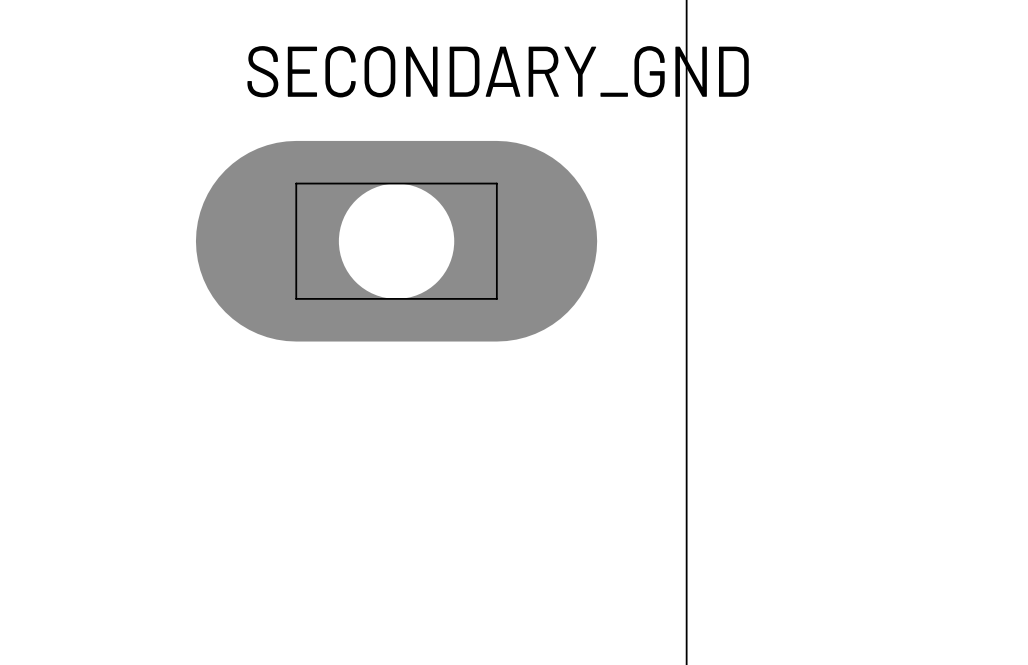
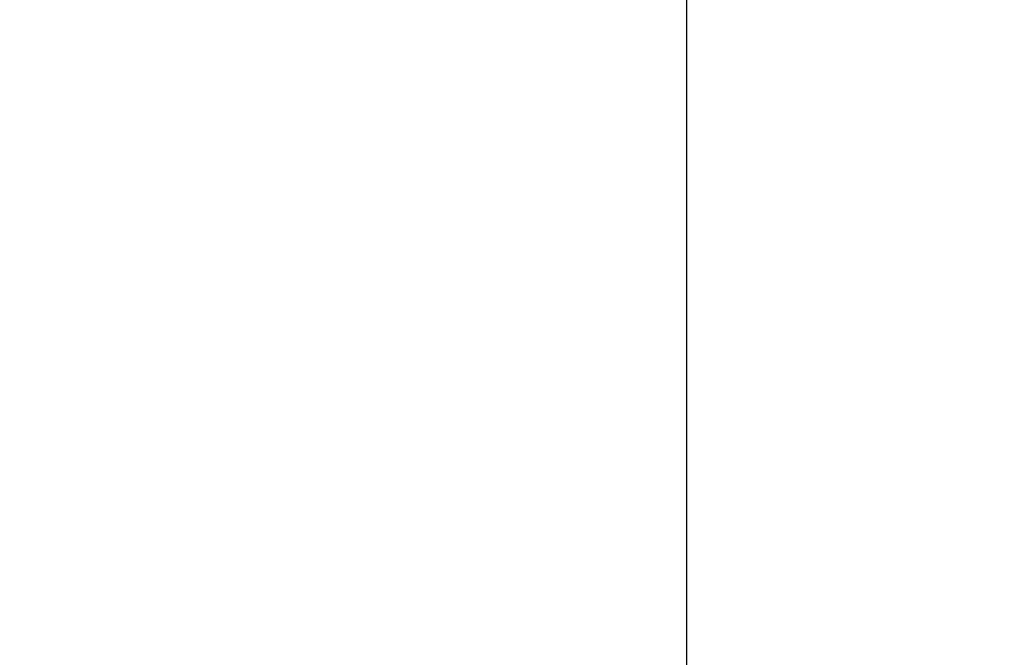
SECONDARY_GND: (396, 241) -> none

